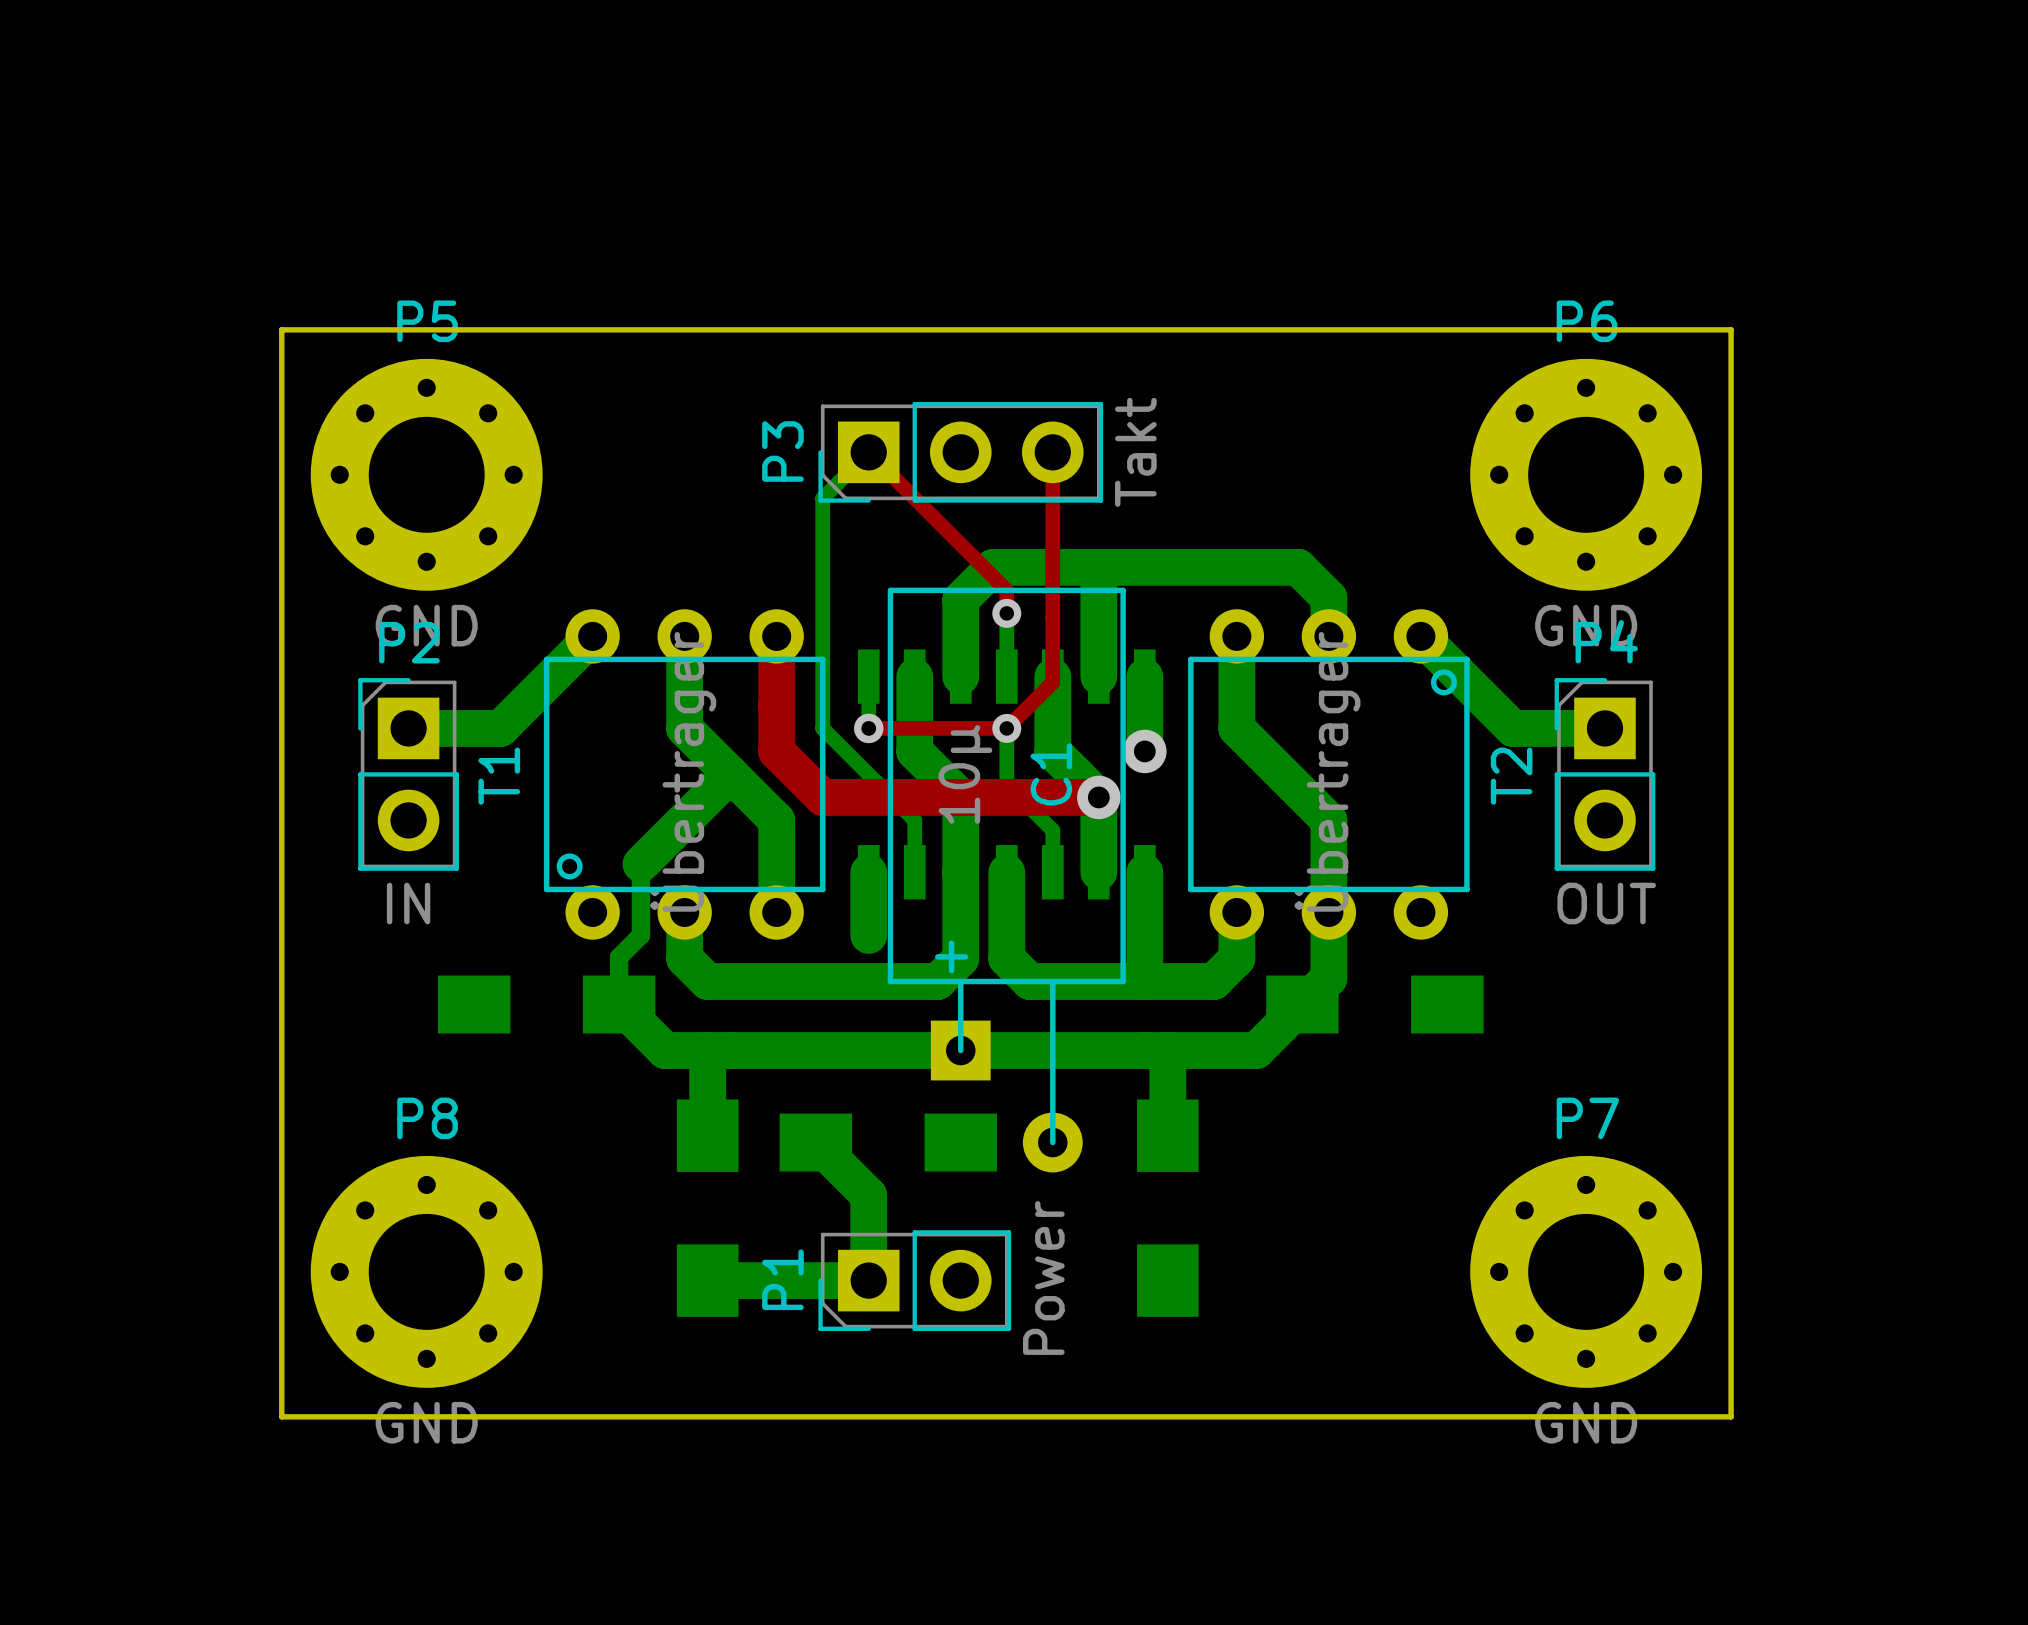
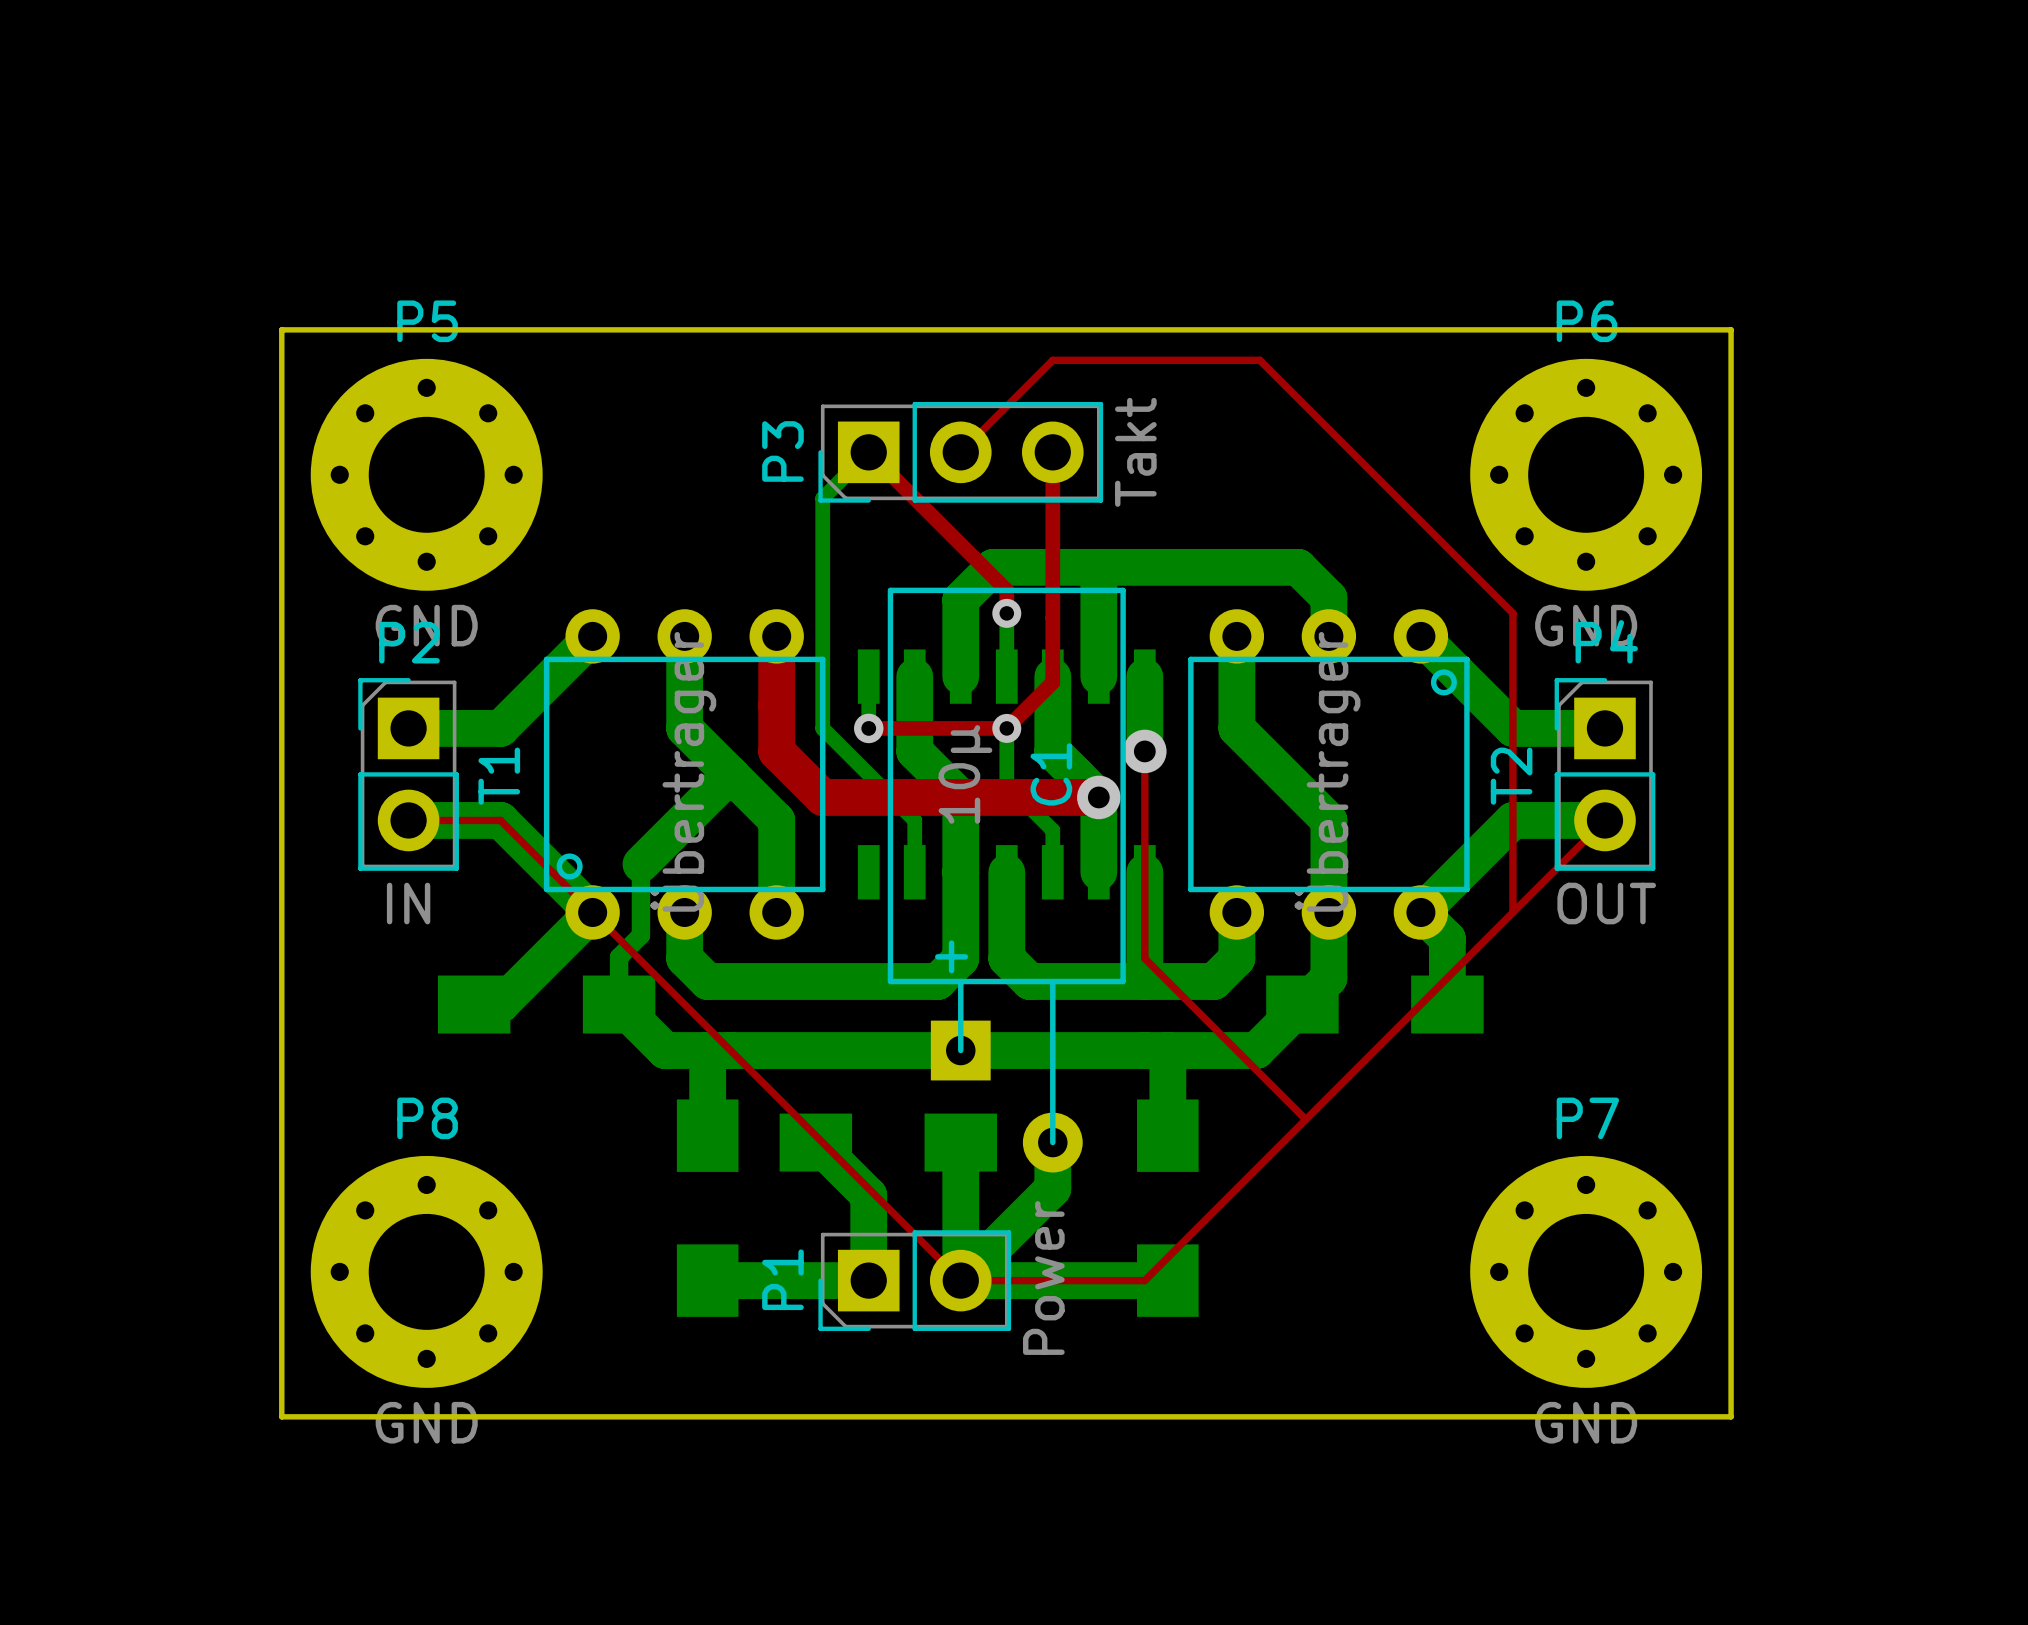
top track: none -> (960, 452) (1052, 360) (1259, 360) (1512, 613) (1512, 912)
top track: none -> (1144, 751) (1144, 958) (1305, 1119)
bottom track: none -> (408, 820) (500, 820) (592, 912) (500, 1004) (474, 1004)
top track: none -> (408, 820) (500, 820) (960, 1280) (1144, 1280) (1604, 820)
bottom track: none -> (1604, 820) (1512, 820) (1420, 912) (1447, 938) (1447, 1004)
bottom track: (868, 872) (868, 935) -> none
bottom track: none -> (960, 1142) (960, 1280)
bottom track: none -> (1052, 1142) (1052, 1188) (960, 1280)
bottom track: none -> (960, 1280) (1167, 1280)

